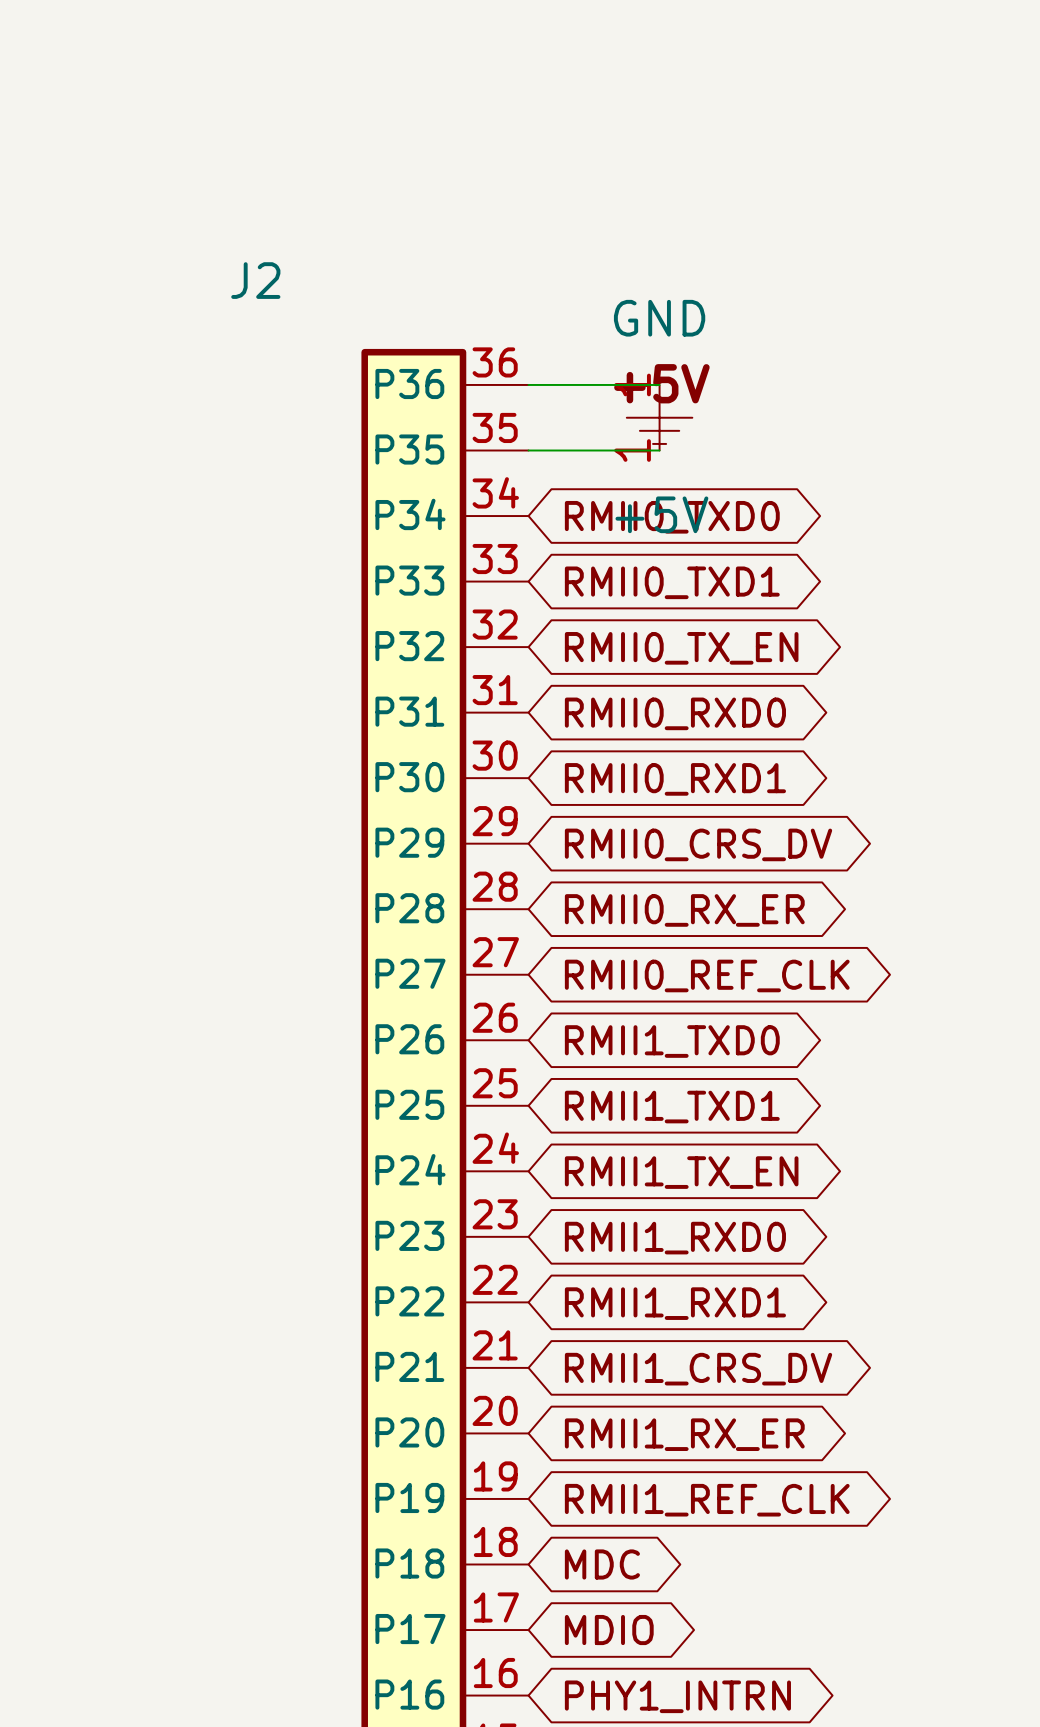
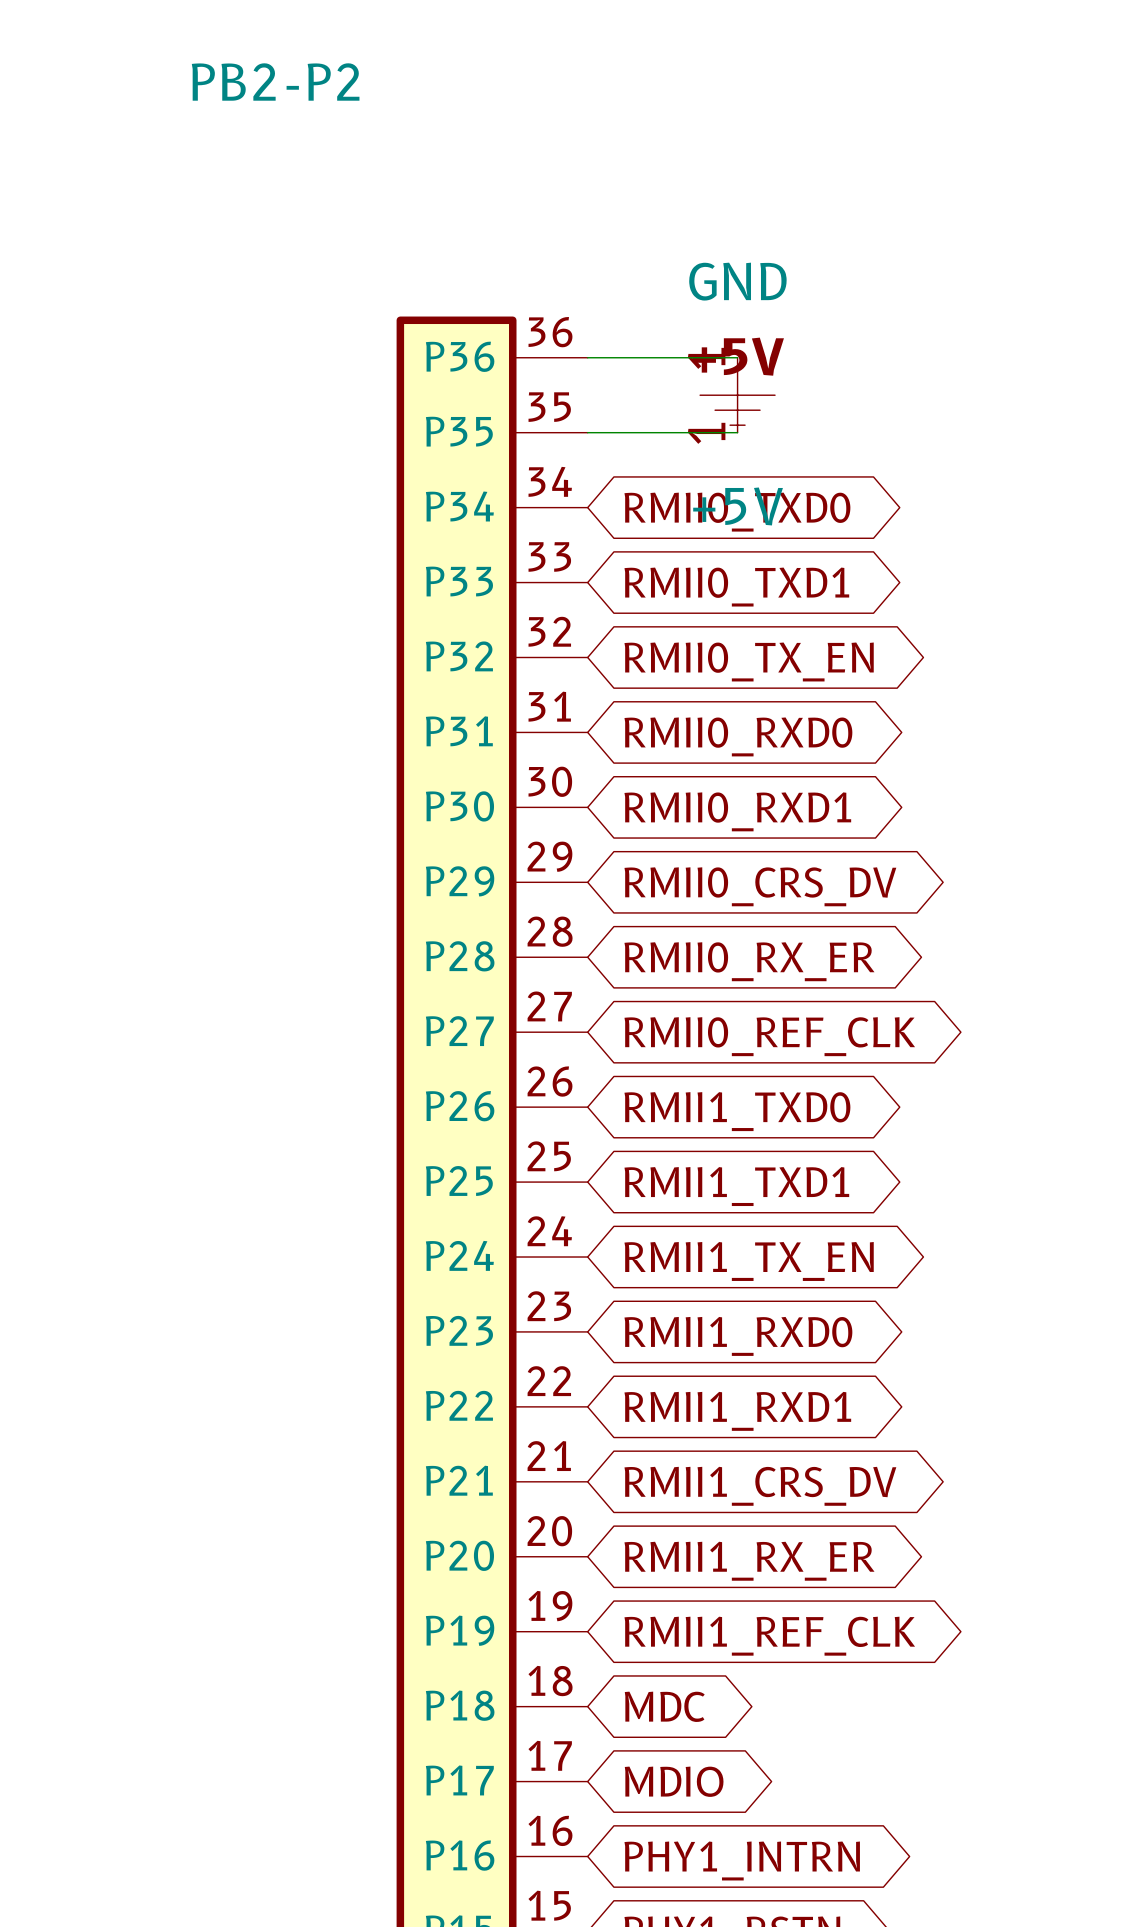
J2 name: J2 (255, 280) -> PB2-P2 (275, 82)

